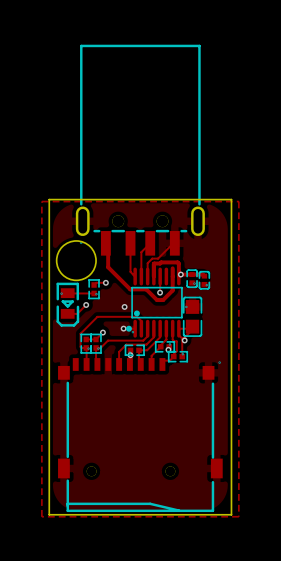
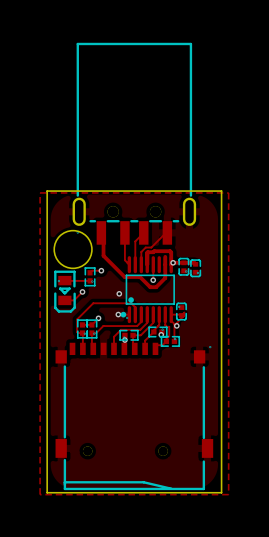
part footprint: [182, 296, 203, 337] -> [176, 302, 187, 321]

